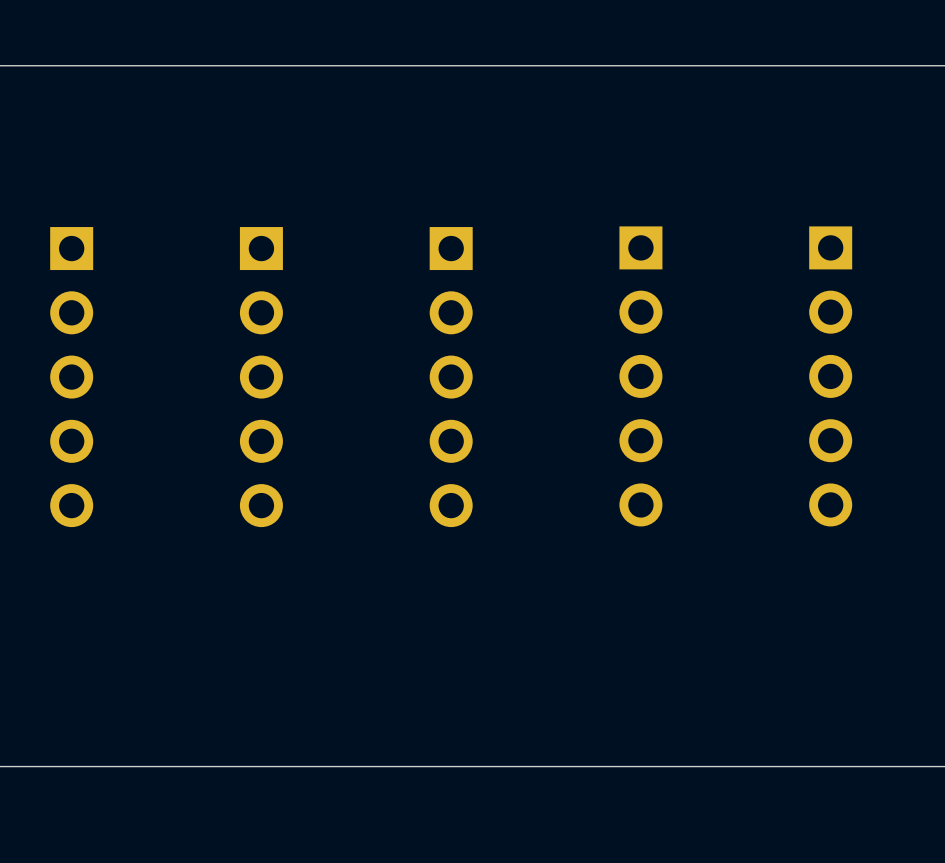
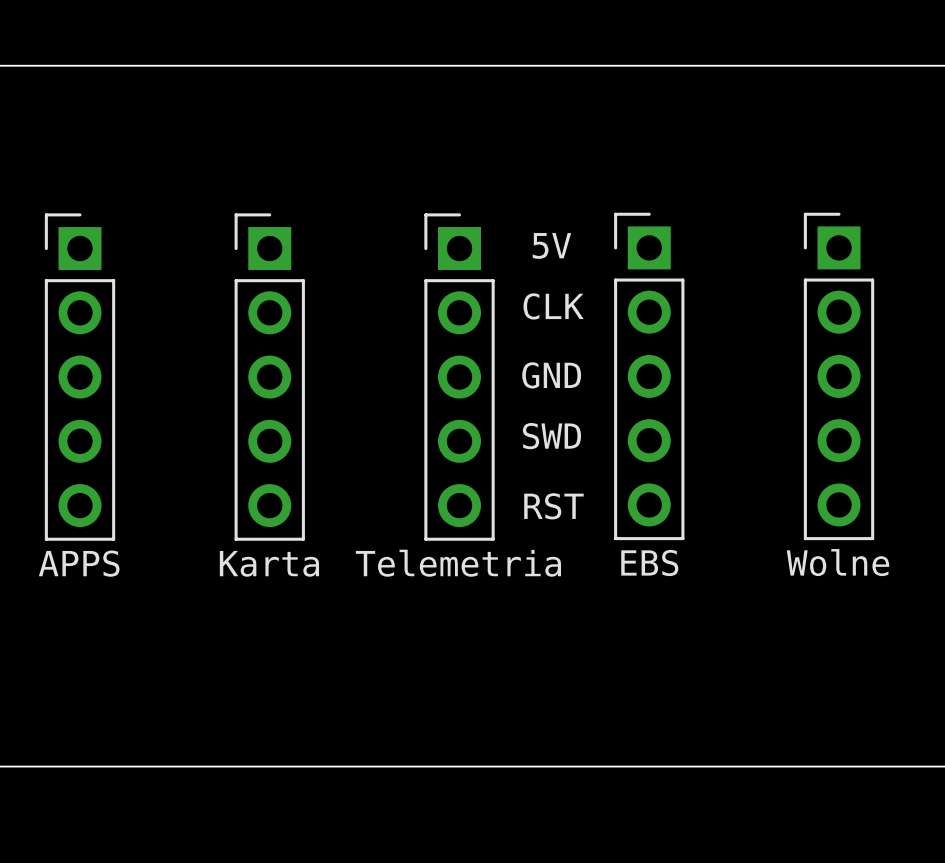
text: none -> 5V (551, 245)
text: none -> CLK (553, 306)
text: none -> GND (551, 375)
part side: top (640, 376) -> bottom (649, 376)
part side: top (830, 376) -> bottom (839, 376)
part side: top (71, 377) -> bottom (80, 377)
part side: top (261, 377) -> bottom (269, 377)
part side: top (451, 377) -> bottom (459, 377)
text: none -> SWD (551, 436)
text: none -> RST (553, 506)

